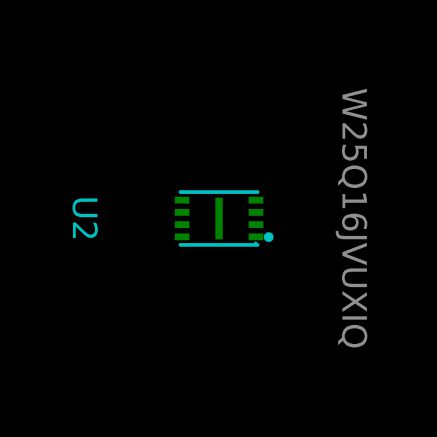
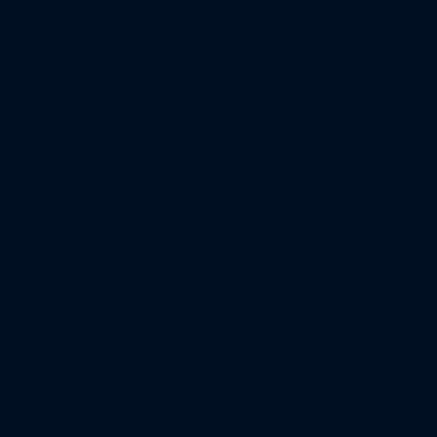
U2: W25Q16JVUXIQ (224, 218) -> none

